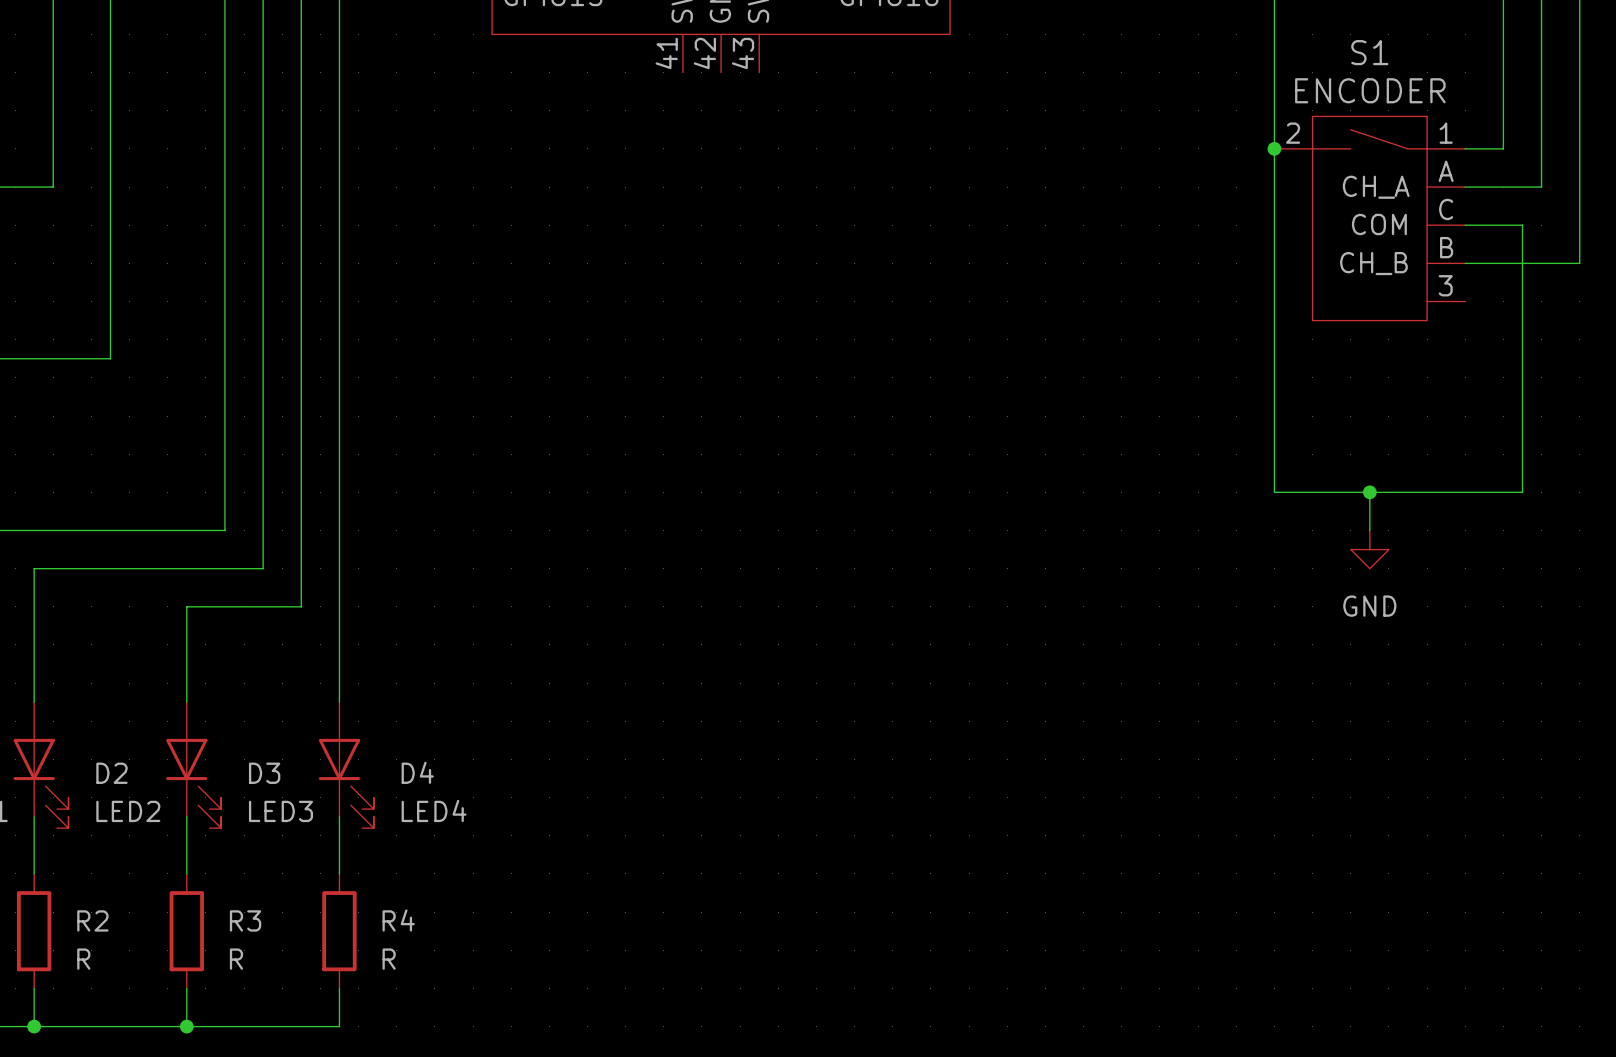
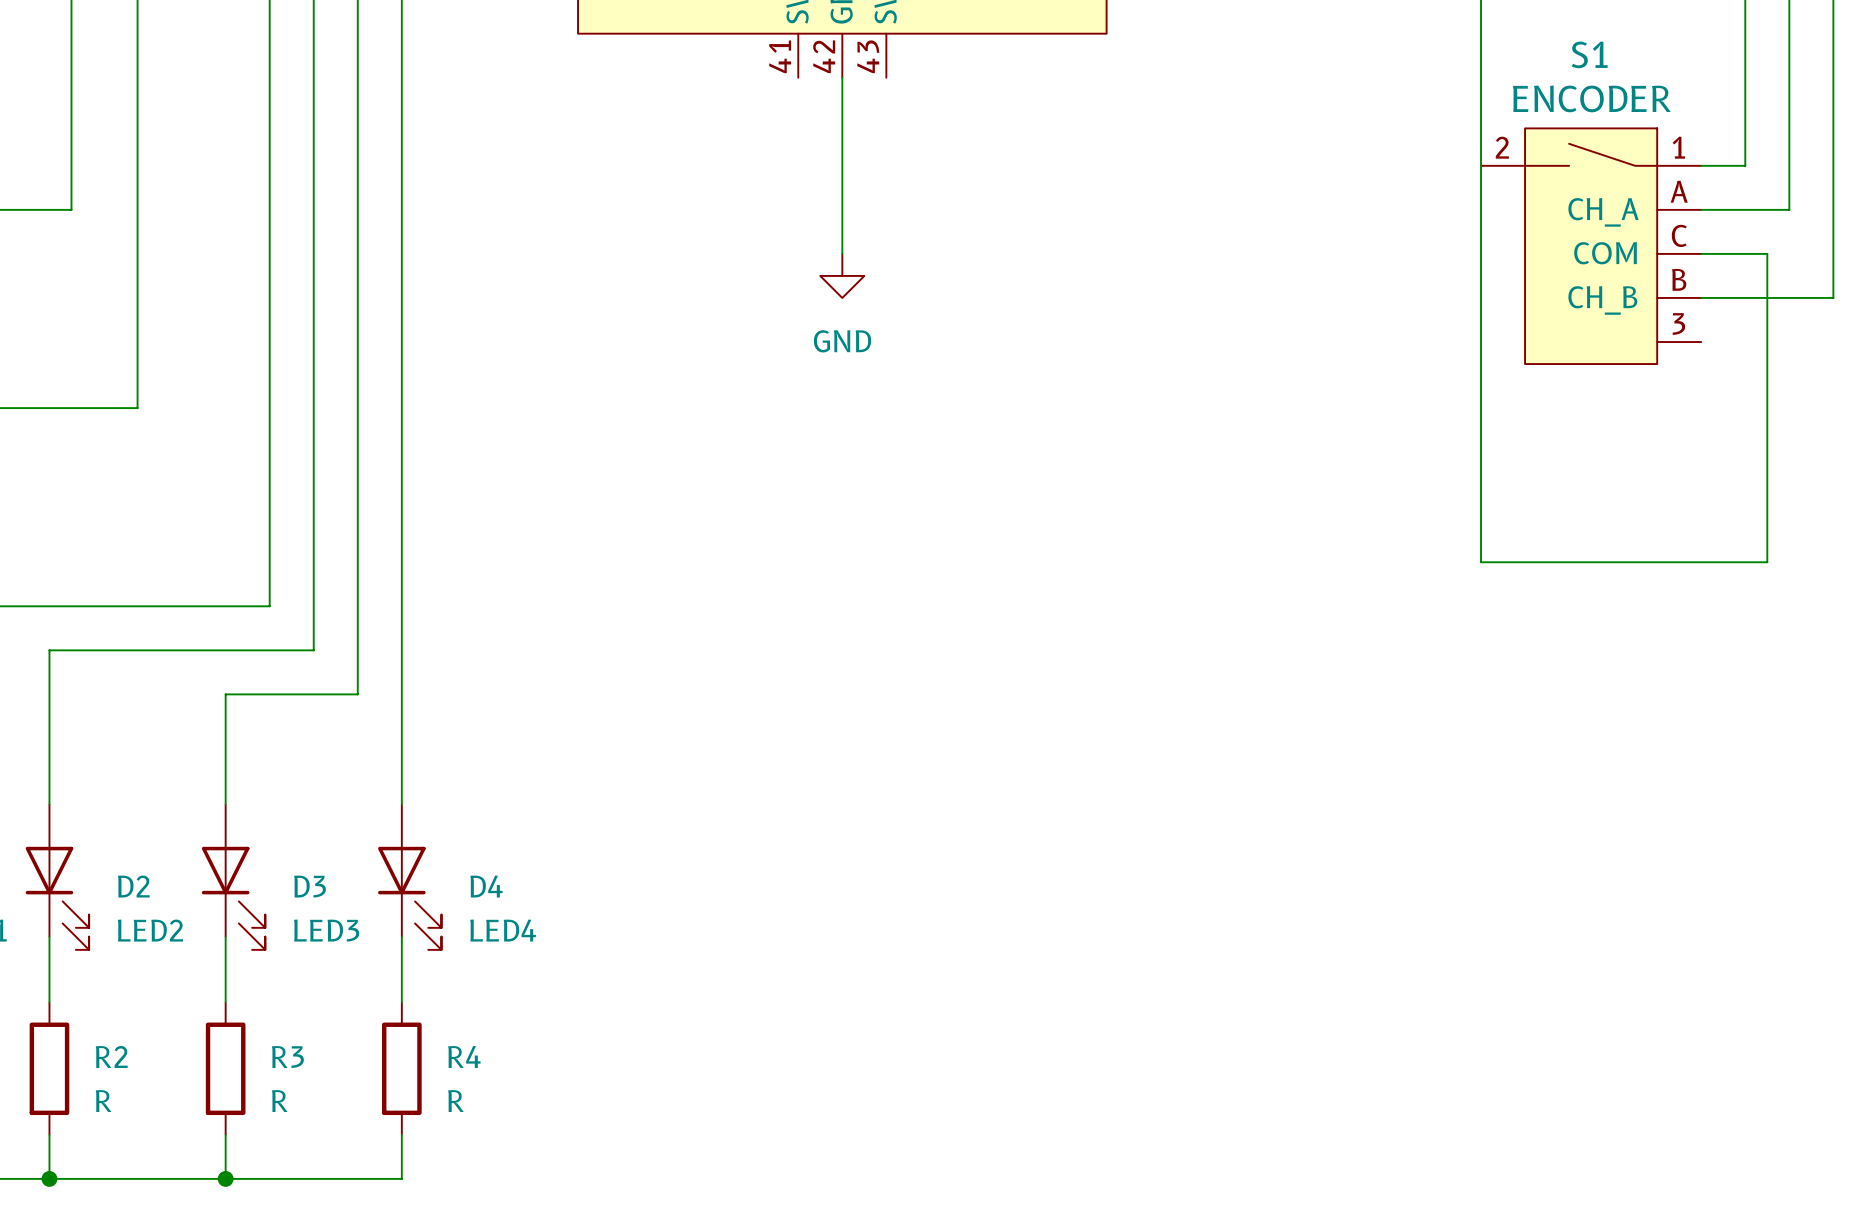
wire: none -> (842, 77) (842, 253)
junction: (1274, 148) -> none
power symbol: none -> GND (842, 275)
wire: (1369, 492) (1369, 530) -> none
junction: (1369, 492) -> none
power symbol: GND (1369, 549) -> none

